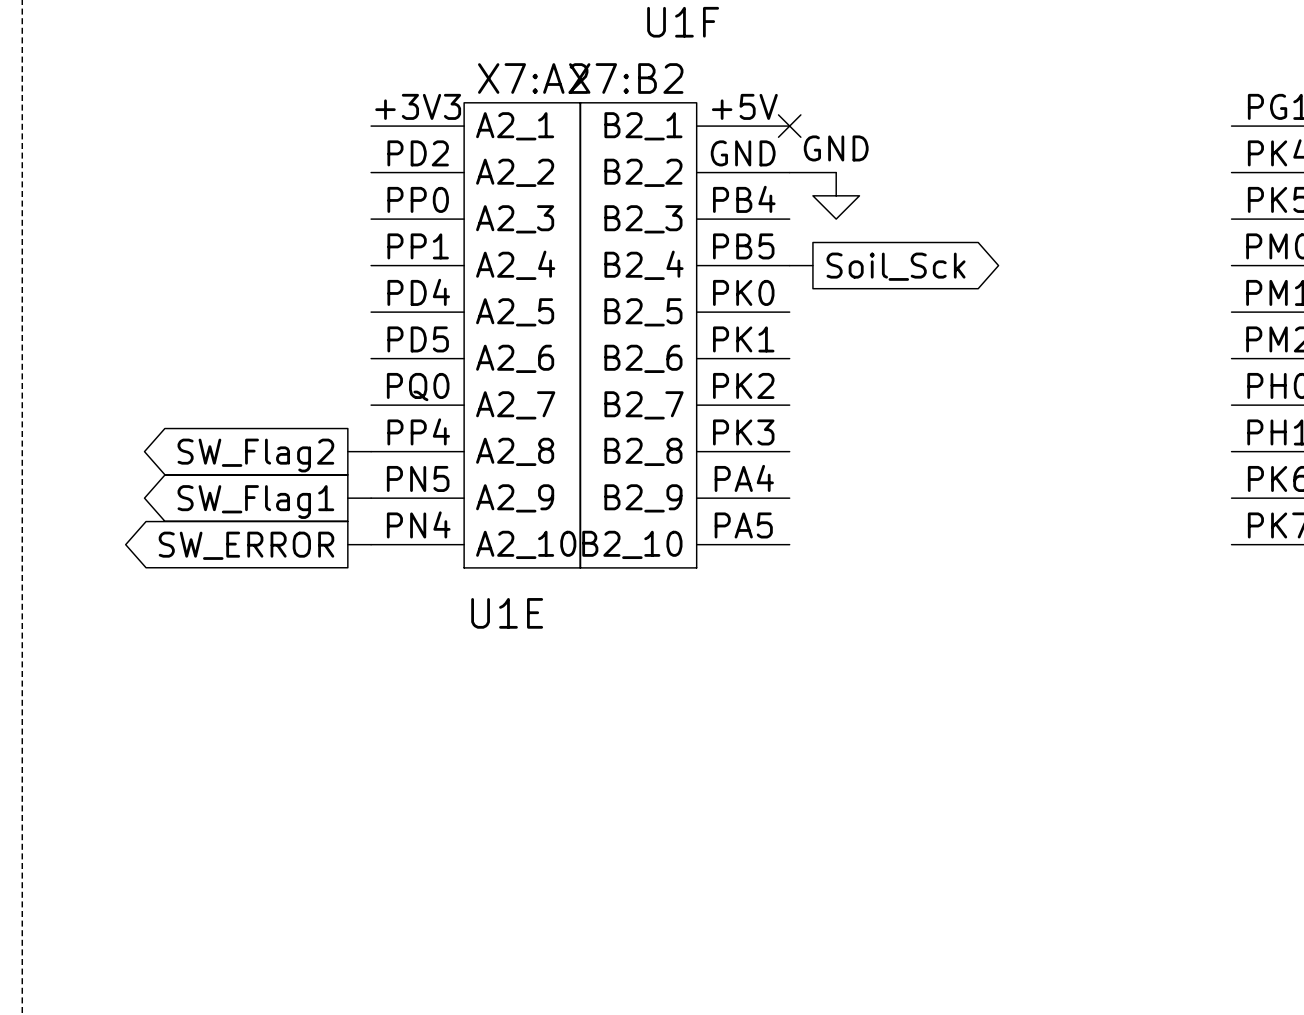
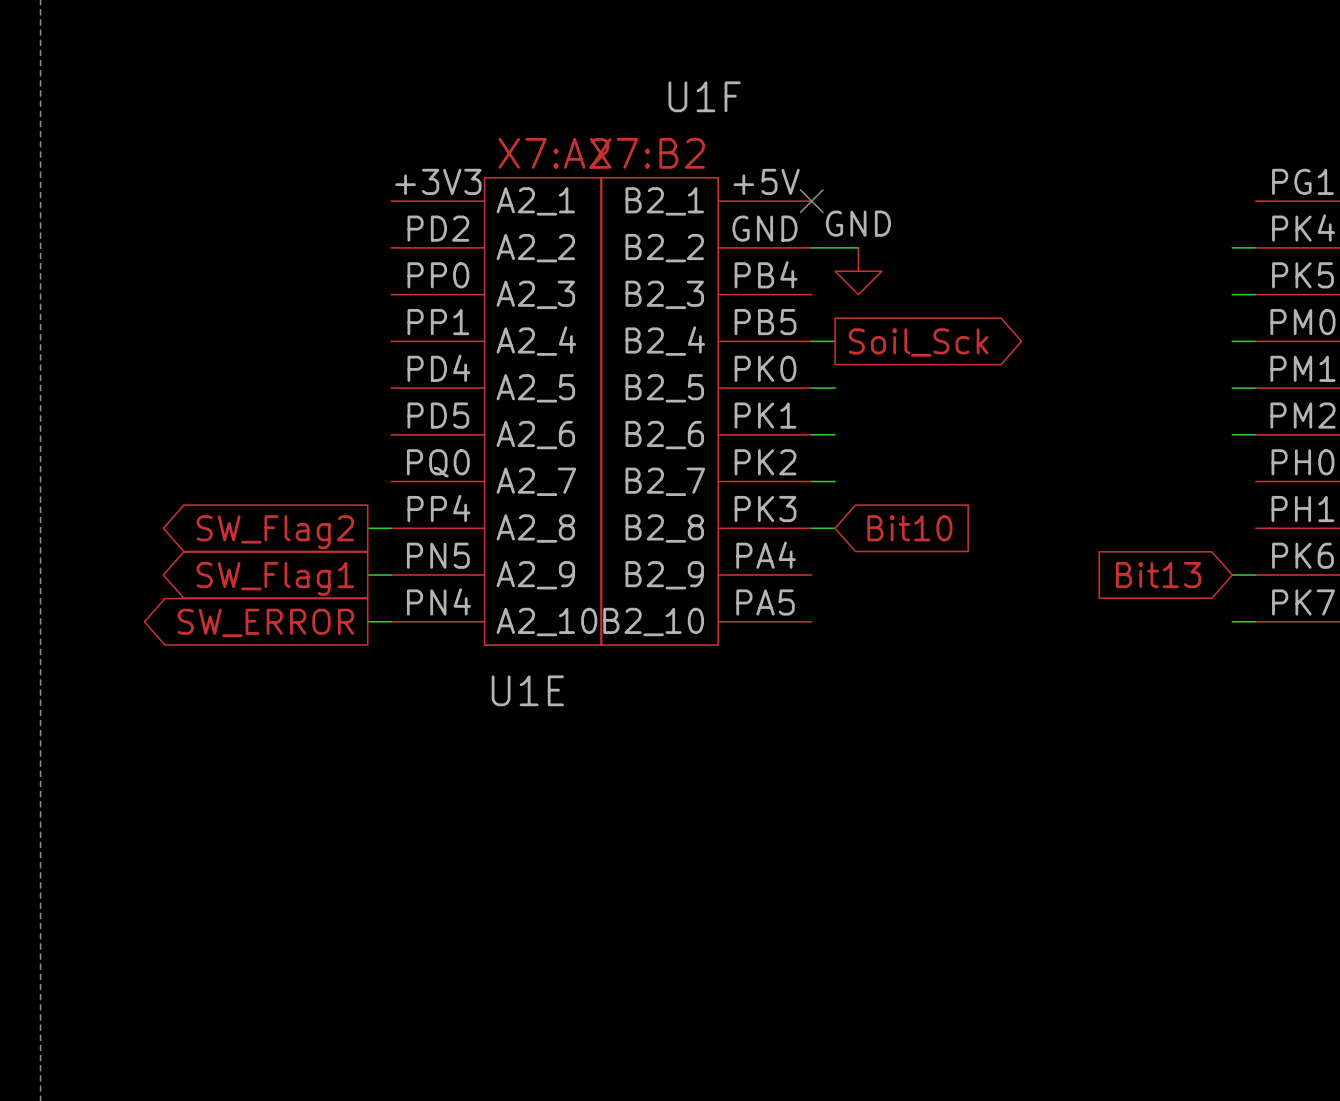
wire: none -> (1232, 247) (1255, 247)
wire: none -> (1232, 294) (1255, 294)
wire: none -> (1232, 341) (1255, 341)
wire: none -> (811, 388) (835, 388)
wire: none -> (1232, 388) (1255, 388)
wire: none -> (811, 434) (835, 434)
wire: none -> (1232, 434) (1255, 434)
wire: none -> (811, 481) (835, 481)
wire: none -> (811, 528) (835, 528)
global label: none -> Bit10 (909, 528)
global label: none -> Bit13 (1158, 575)
wire: none -> (1232, 575) (1255, 575)
wire: none -> (1232, 621) (1255, 621)

